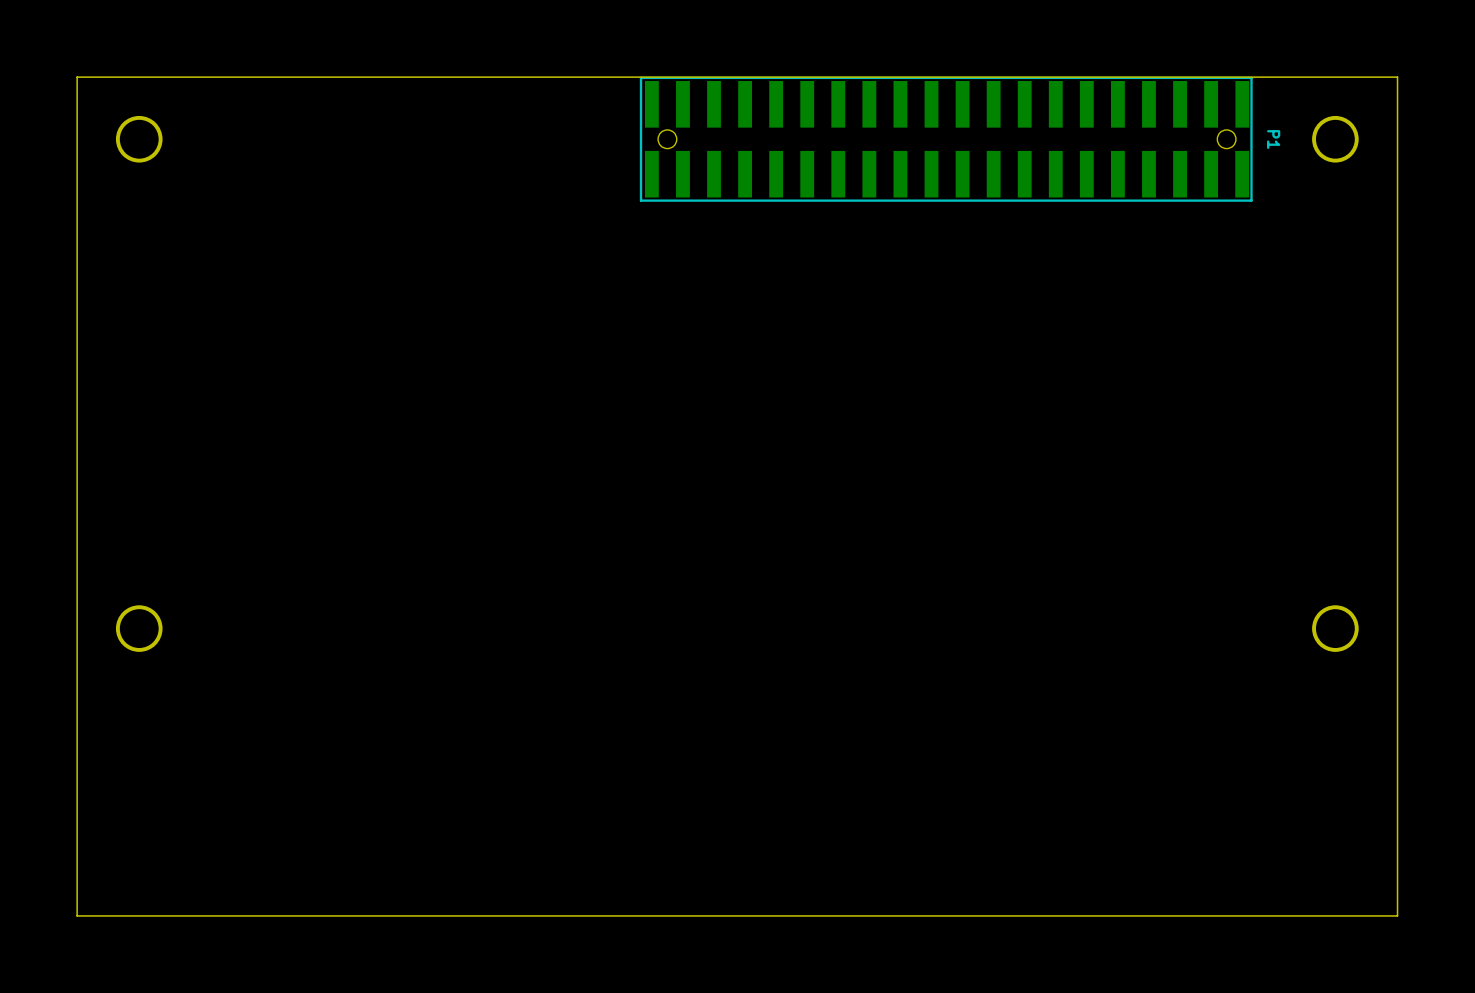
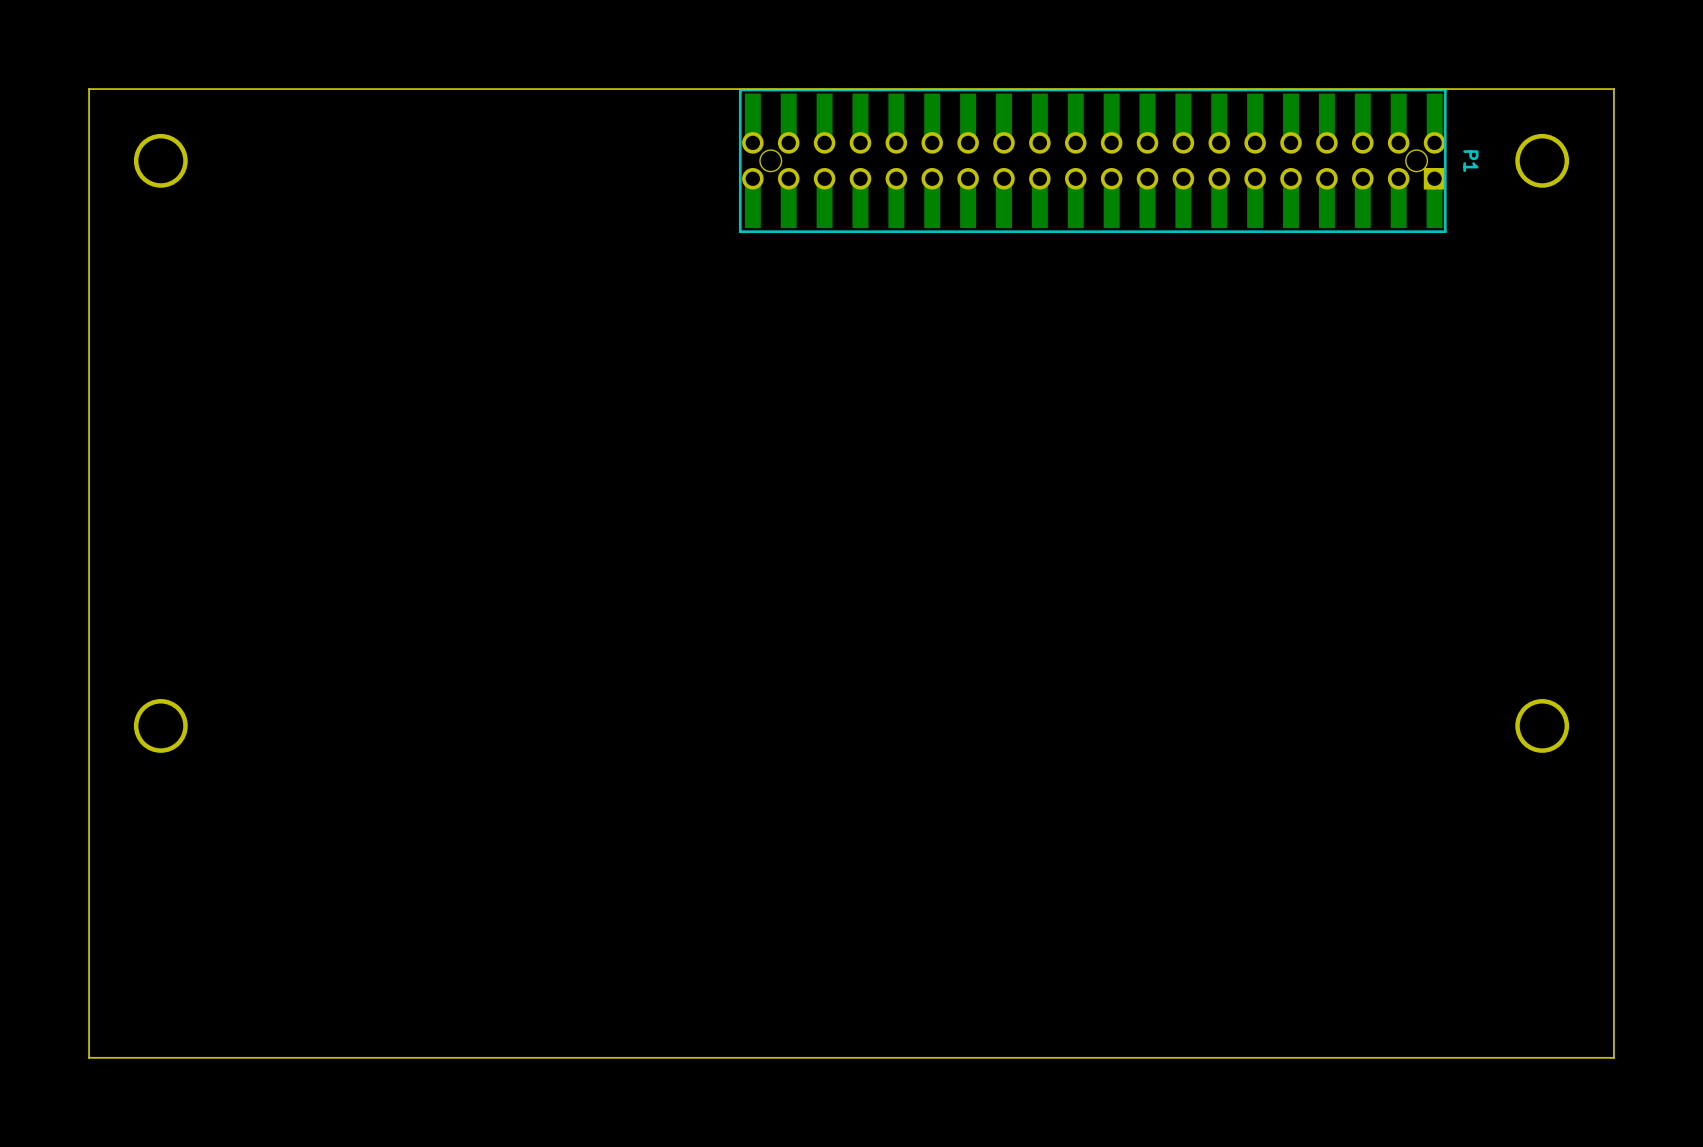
part: none -> (1093, 160)

